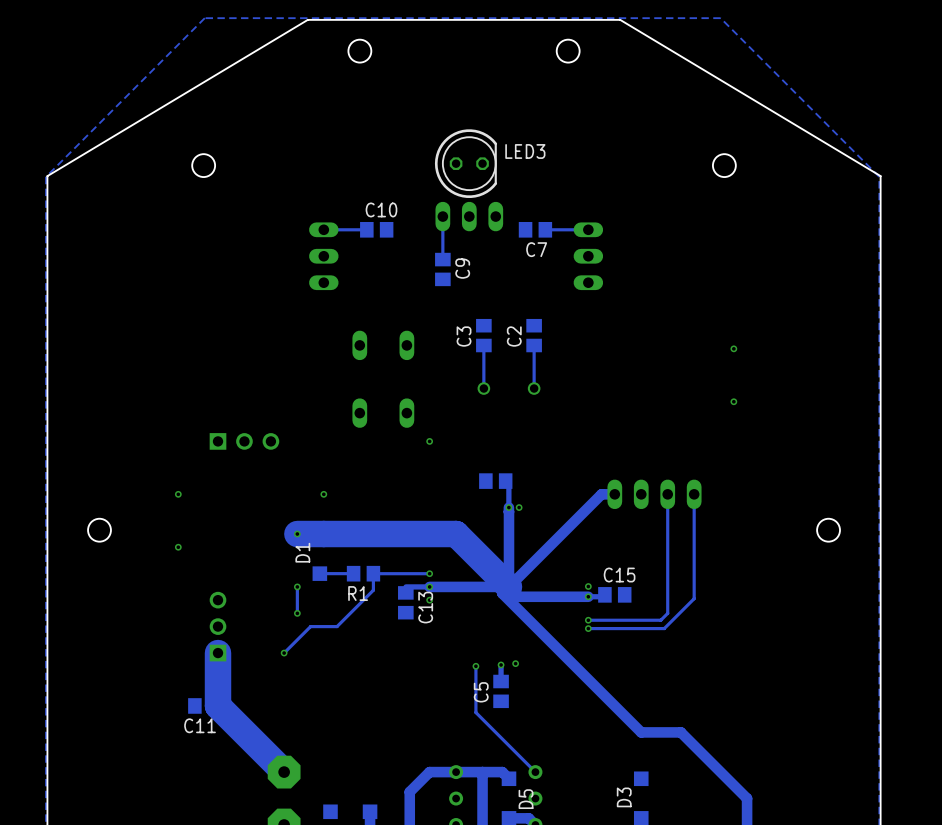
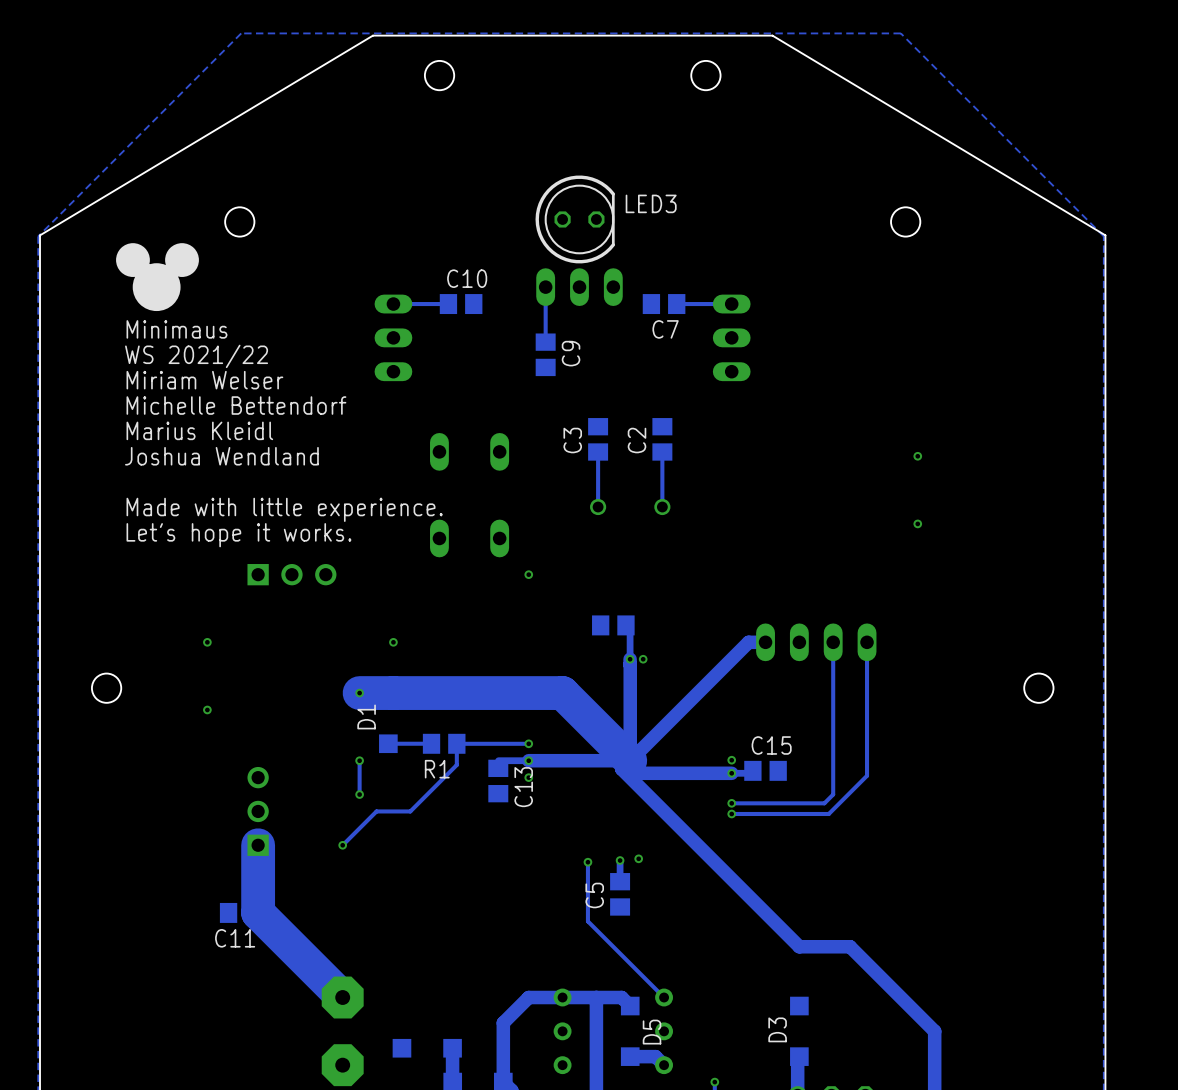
drawing: none -> [116, 243, 199, 312]
text: none -> Minimaus (176, 329)
text: none -> WS 2021/22 (196, 356)
text: none -> Miriam Welser (204, 380)
text: none -> Michelle Bettendorf (236, 405)
text: none -> Marius Kleidl (199, 430)
text: none -> Joshua Wendland (221, 456)
text: none -> Made with little experience. (284, 509)
text: none -> Let's hope it works. (238, 535)

